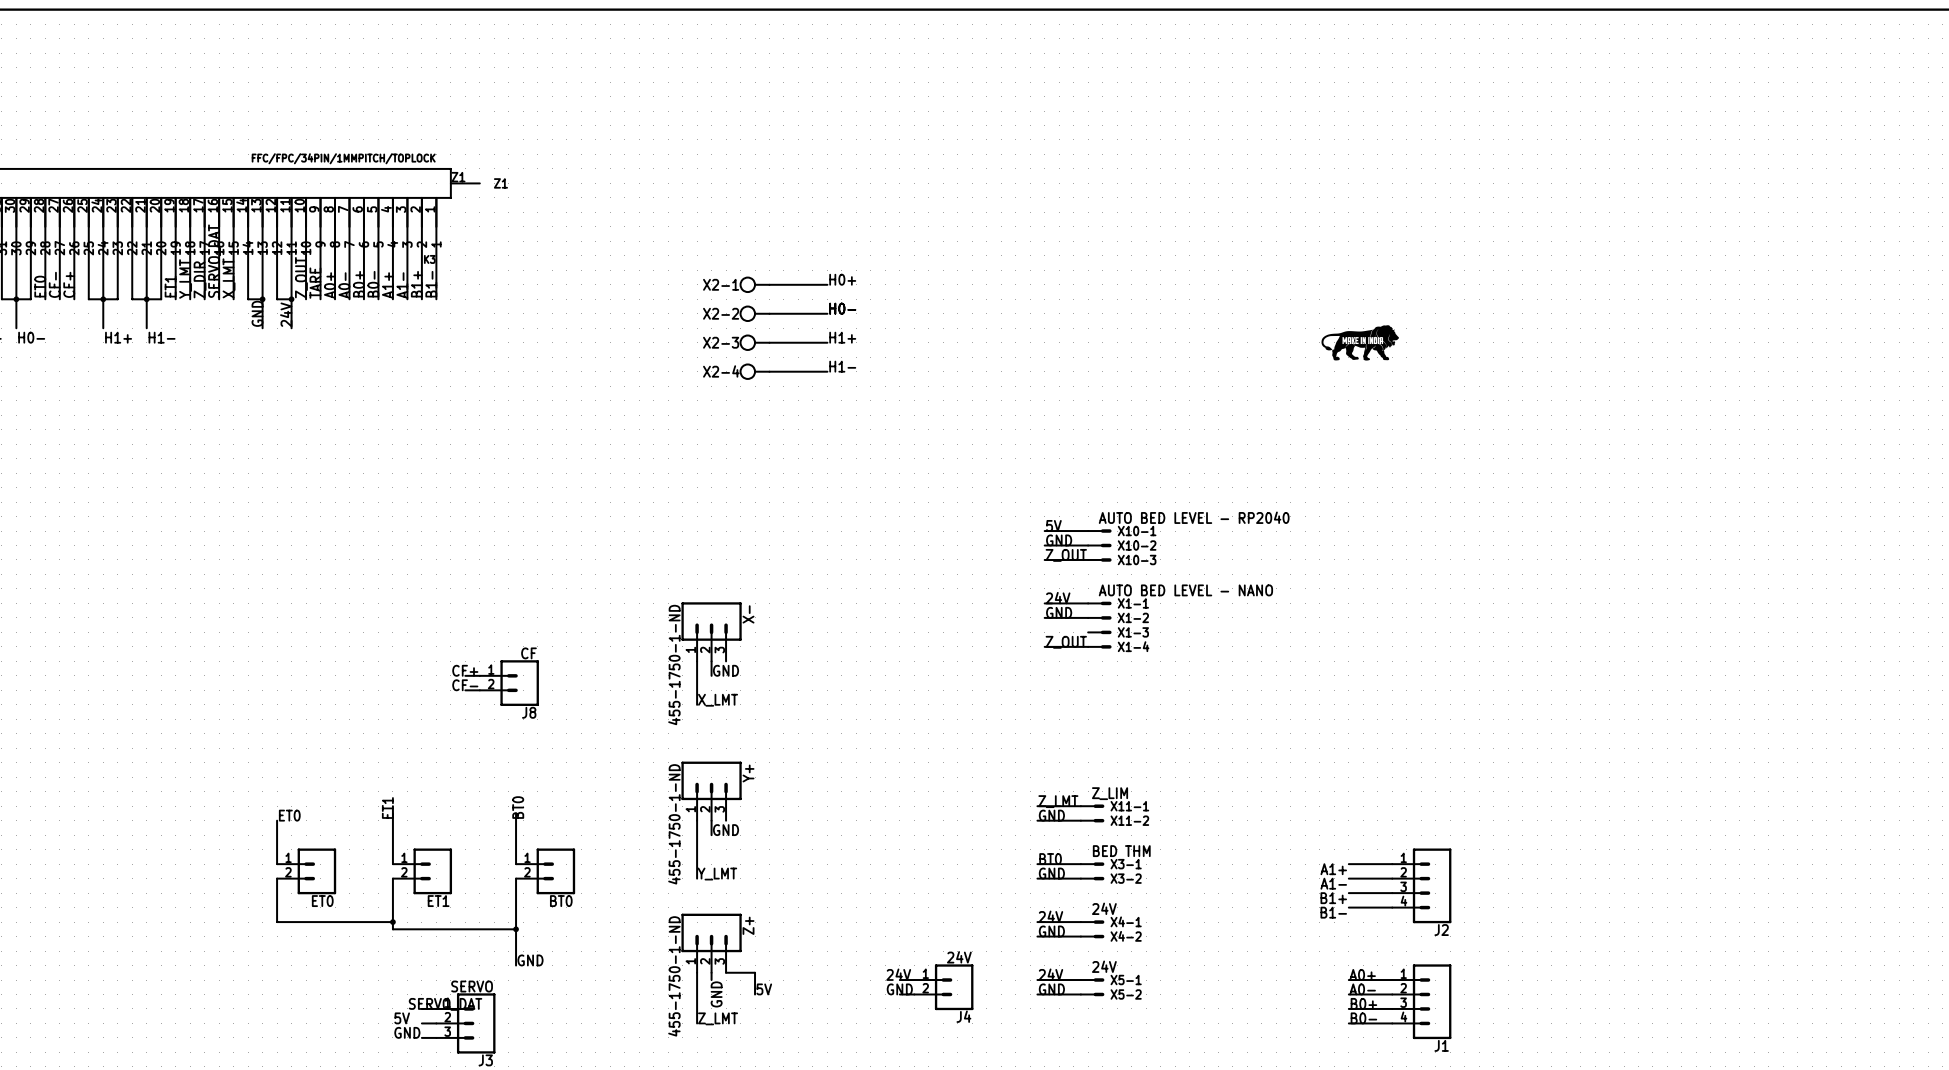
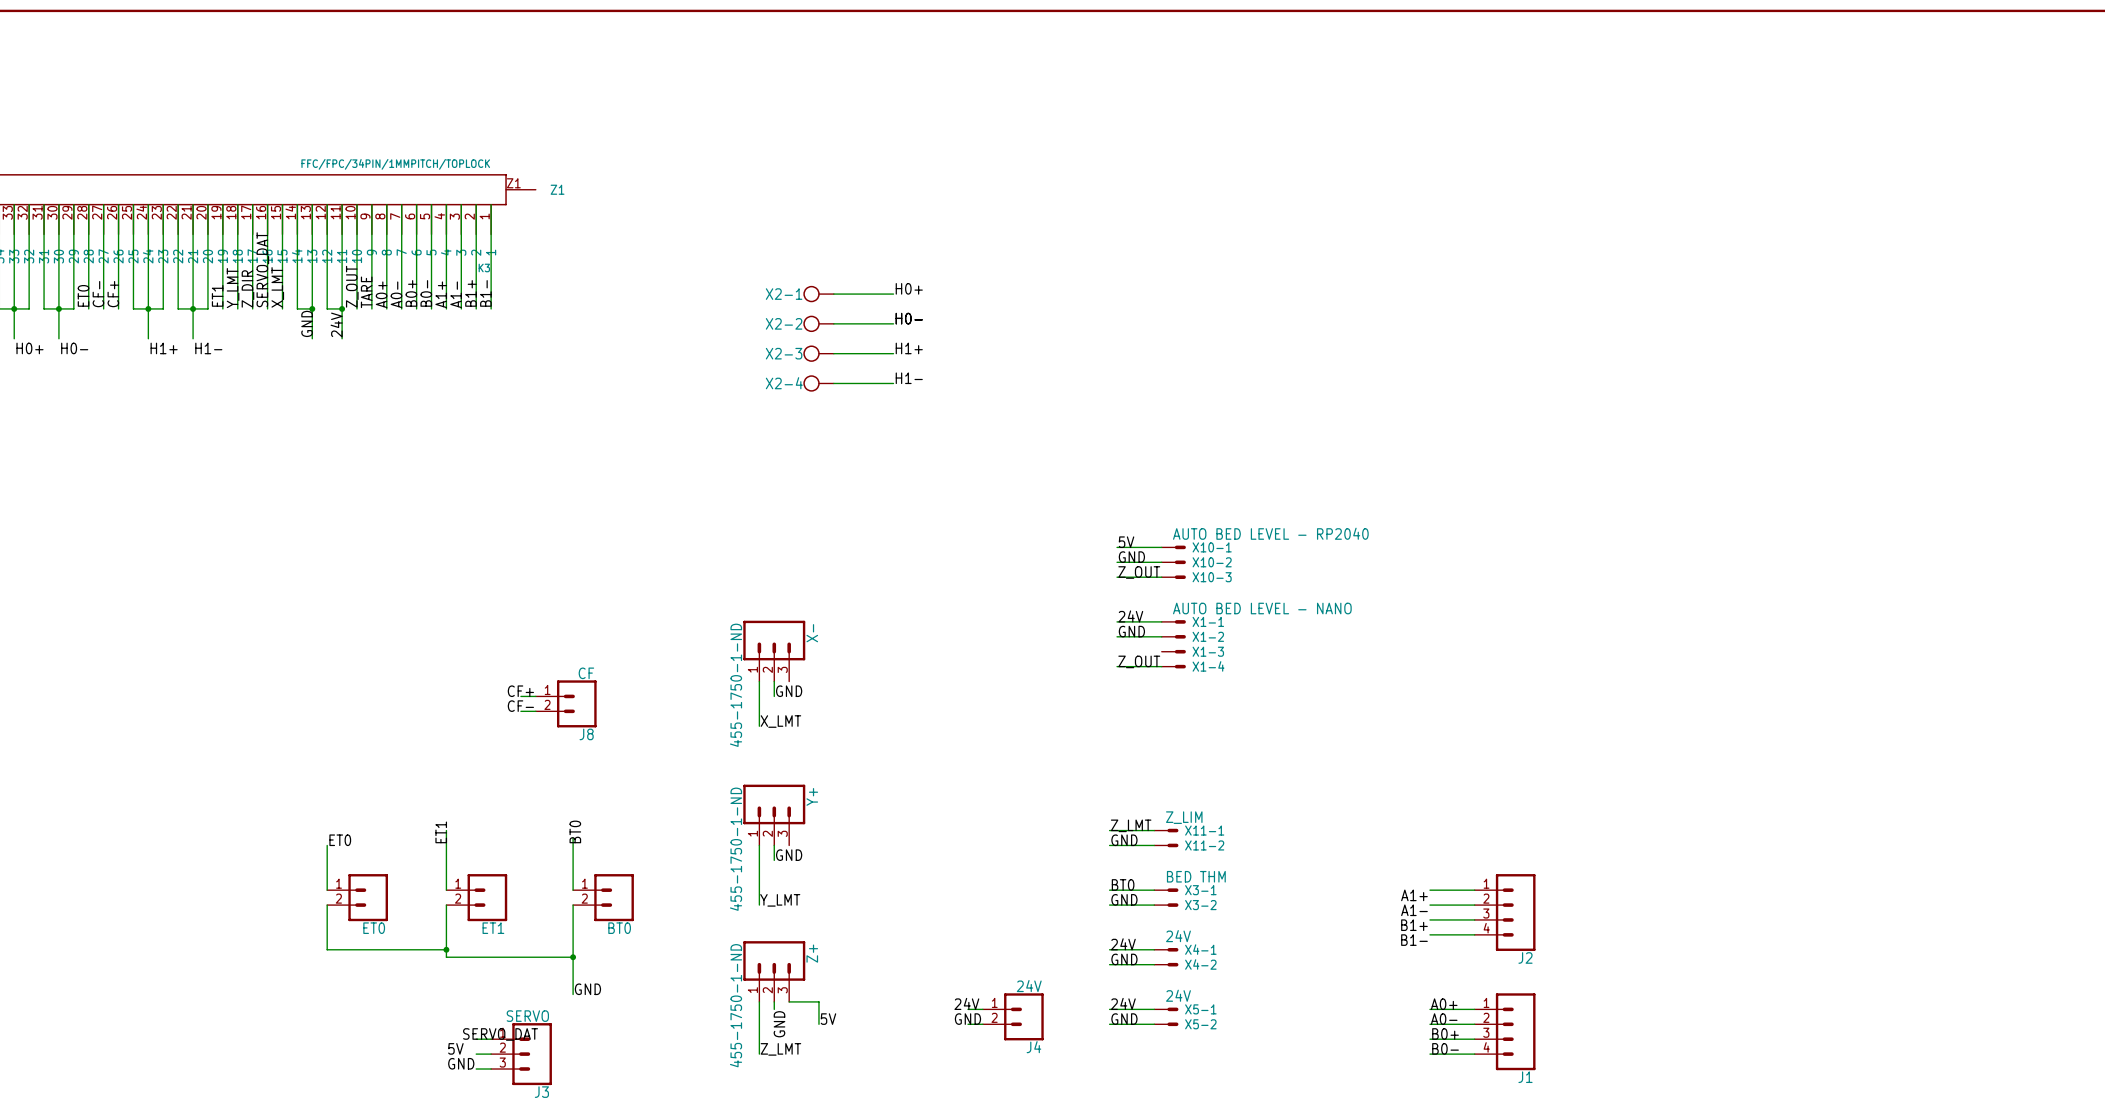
part: (1360, 342) -> none

